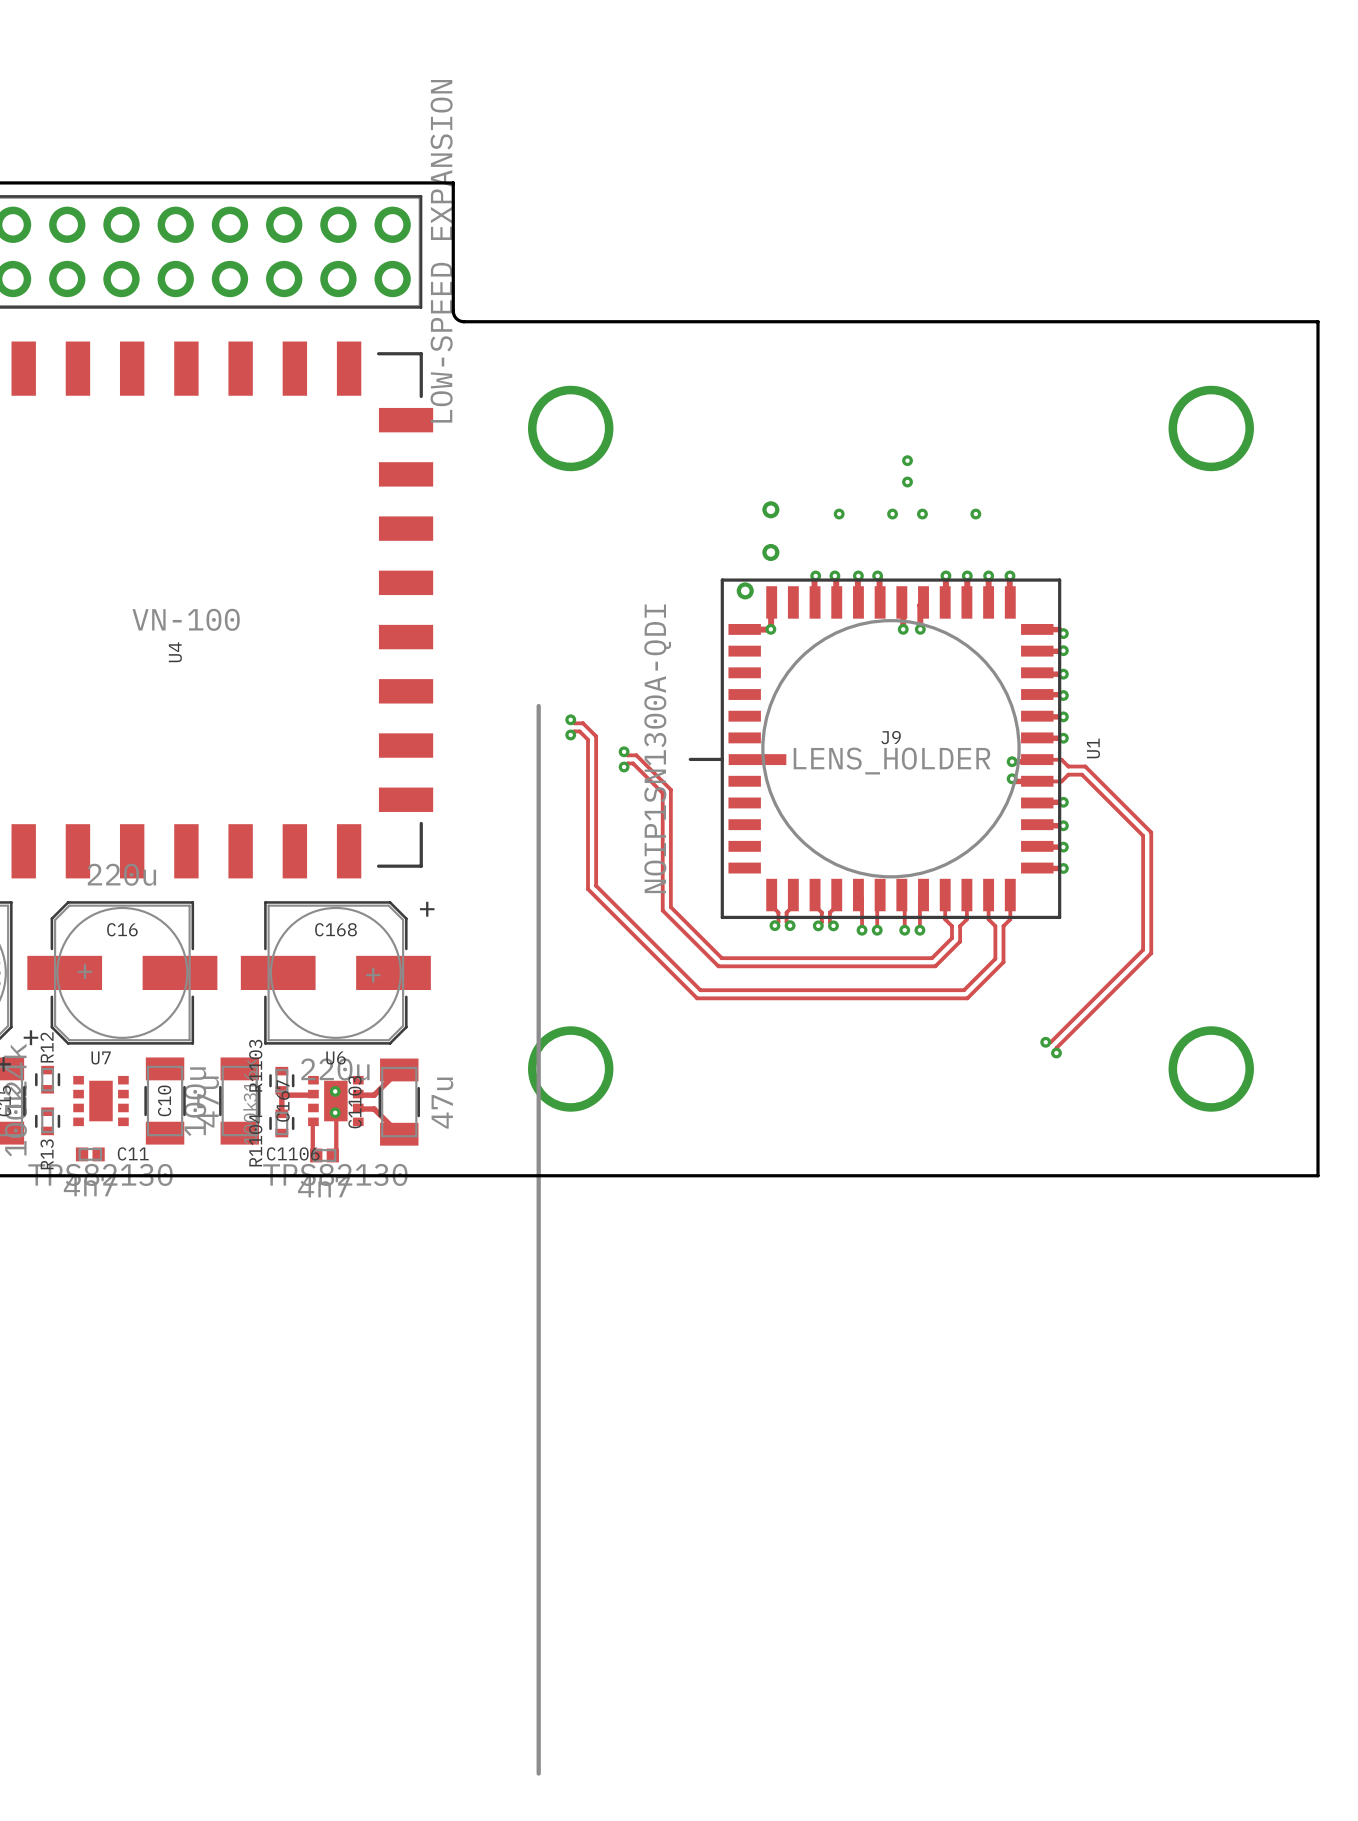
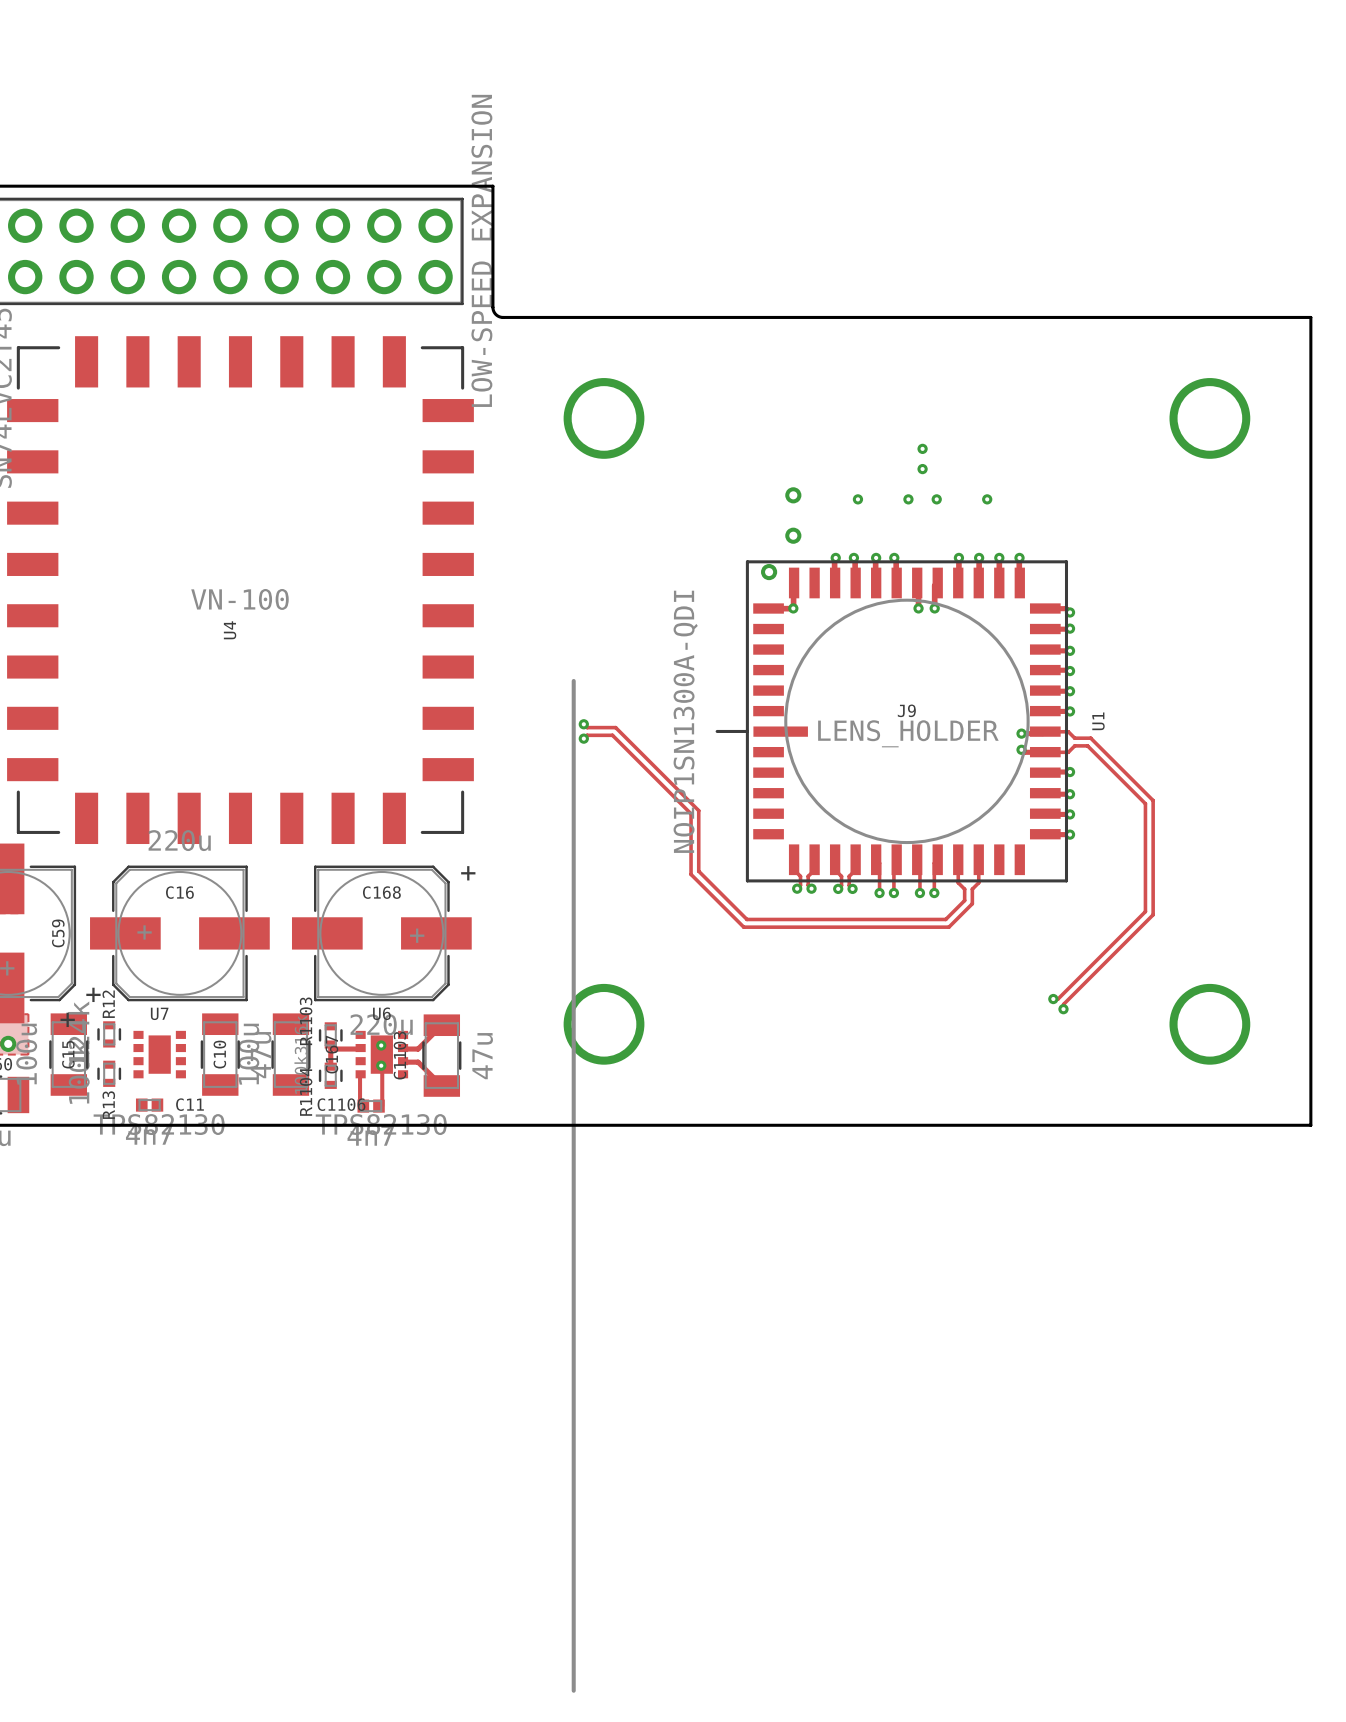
track: (570, 719) (574, 723) (583, 723) (596, 736) (596, 885) (700, 990) (964, 990) (995, 958) (995, 926) (988, 919) (988, 895) -> none
via: (570, 719) -> none
track: (570, 734) (574, 731) (579, 731) (588, 739) (588, 889) (697, 998) (967, 998) (1003, 962) (1003, 926) (1010, 919) (1010, 895) -> none
via: (570, 734) -> none
via: none -> (583, 724)
track: (624, 751) (627, 755) (636, 755) (670, 789) (670, 843) -> (583, 724) (587, 727) (615, 727) (698, 810)
via: (624, 751) -> none
via: none -> (583, 738)
track: (624, 767) (627, 763) (633, 763) (662, 793) (662, 846) -> (583, 738) (587, 735) (612, 735) (691, 813)
via: (624, 767) -> none

